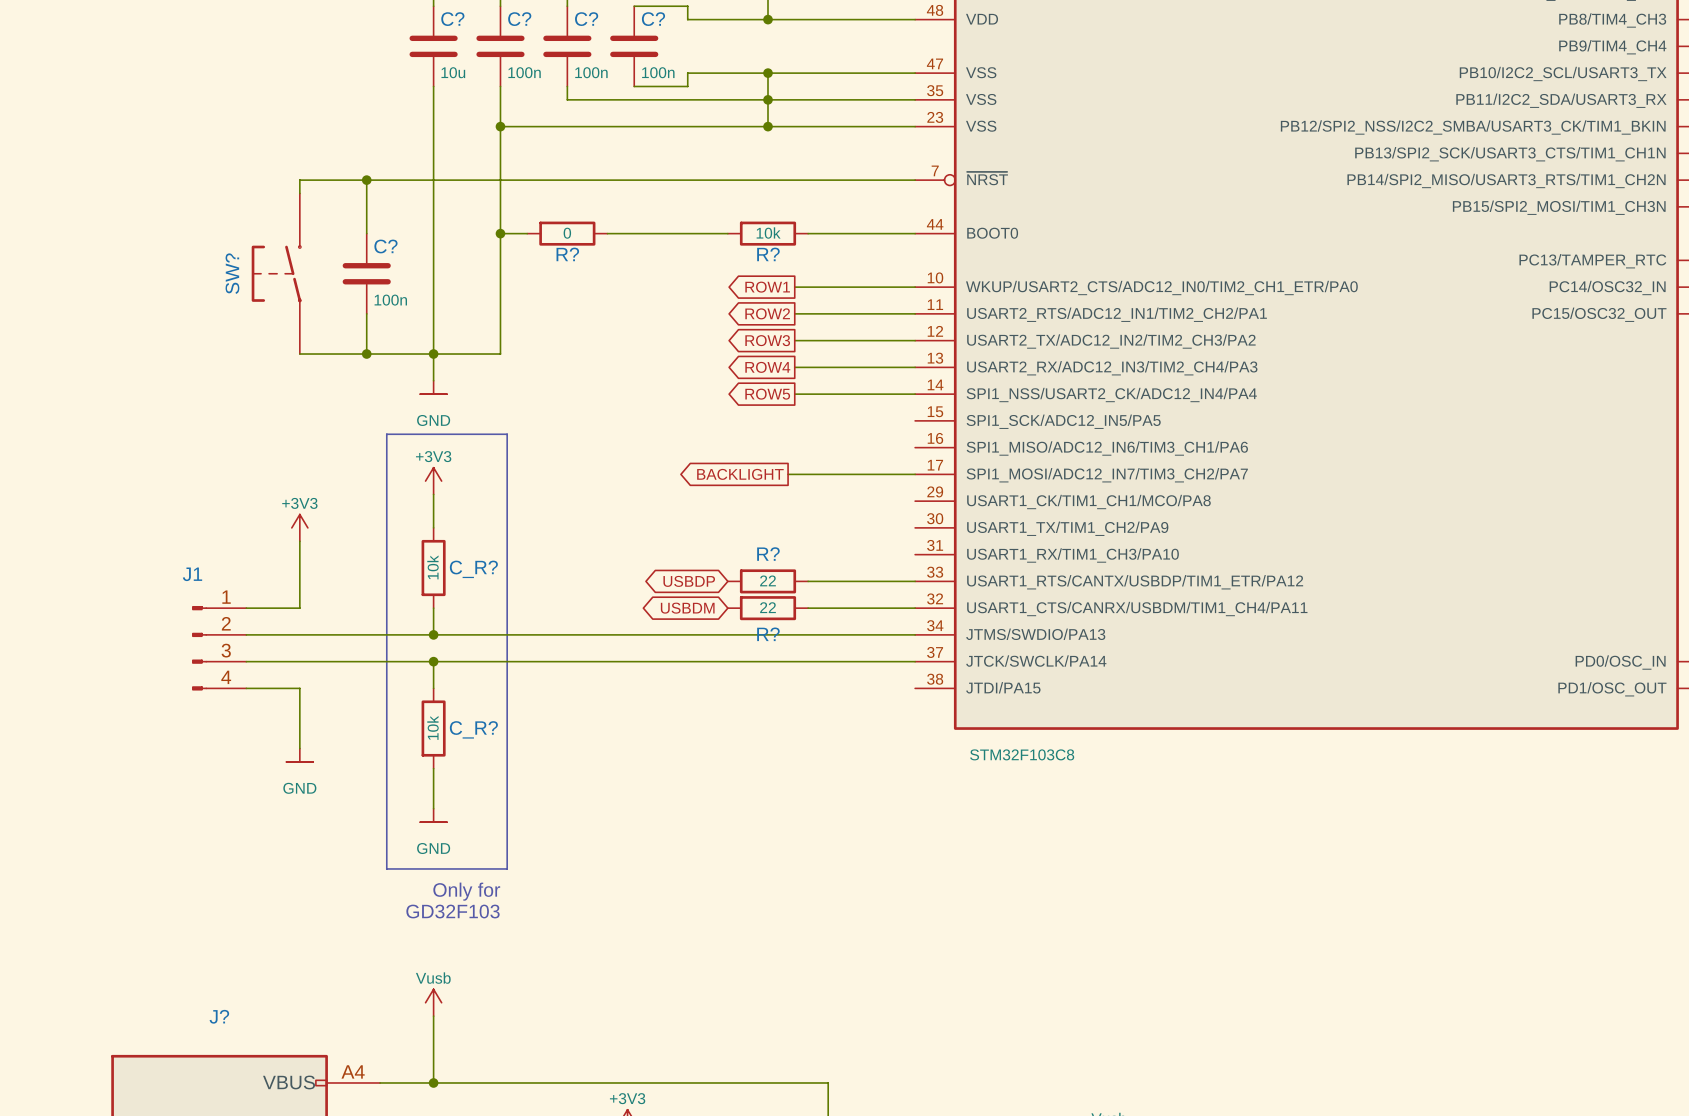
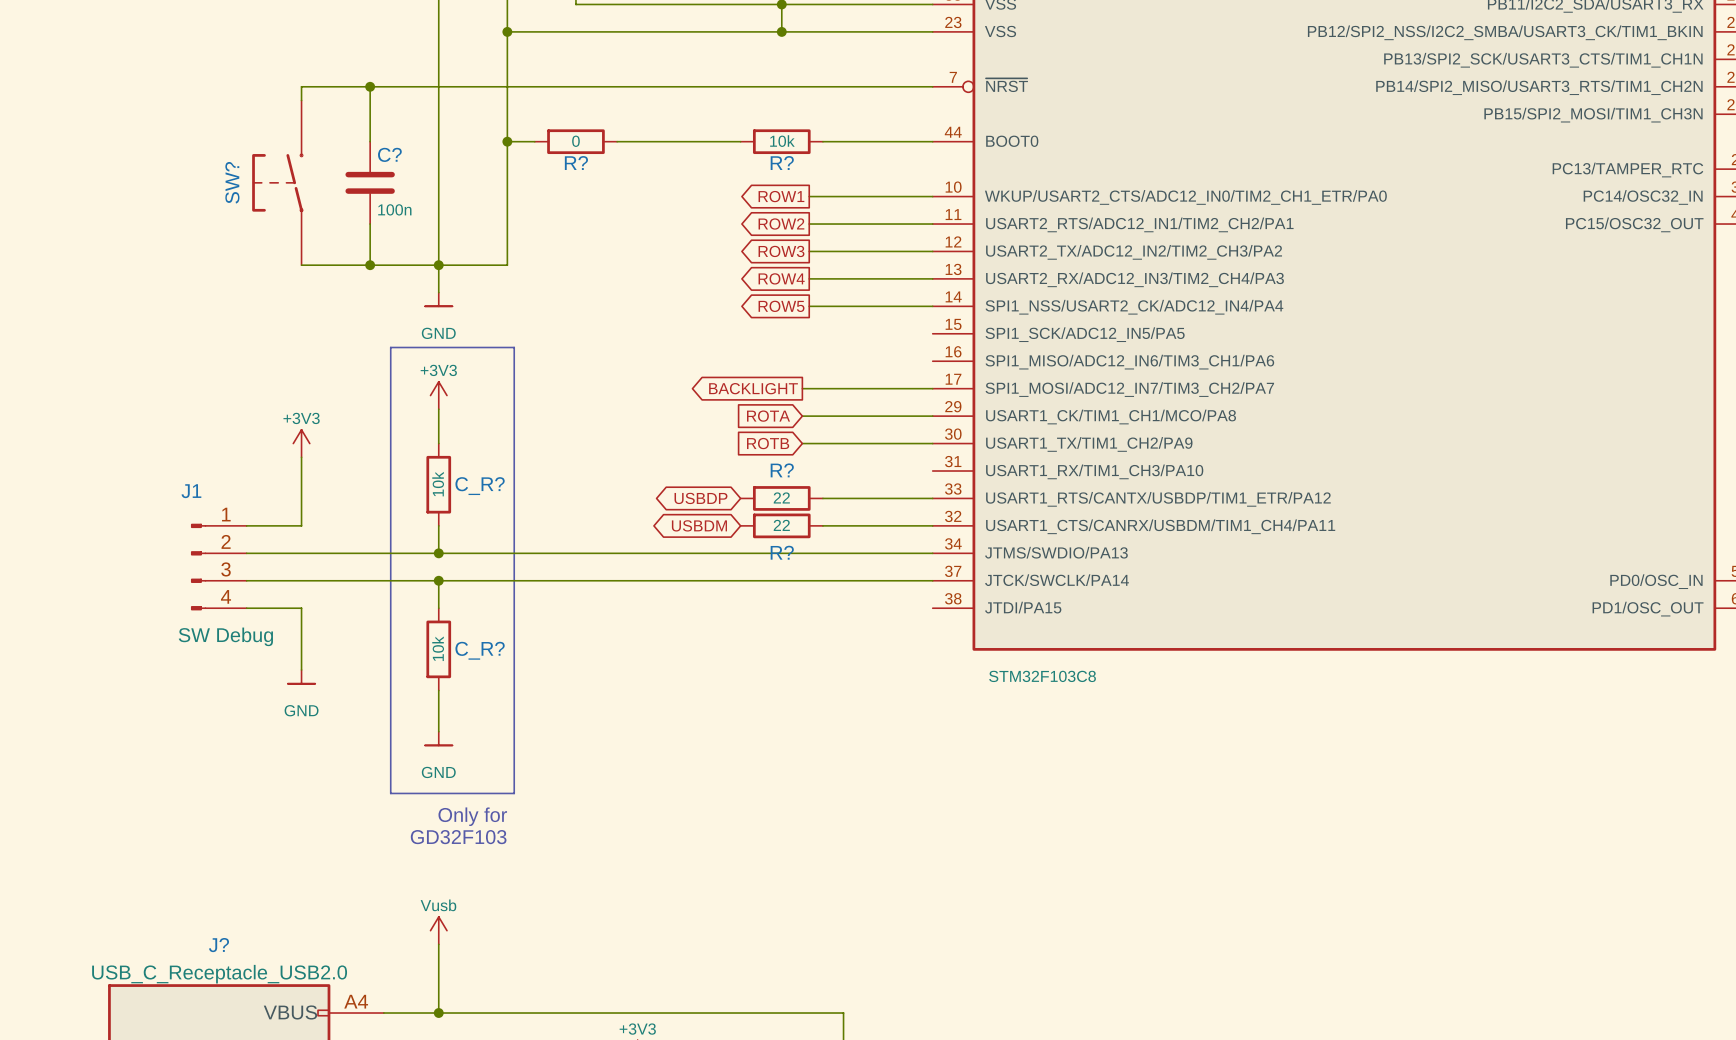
global label: none -> ROTA (768, 416)
wire: none -> (802, 416) (932, 416)
global label: none -> ROTB (768, 443)
wire: none -> (802, 443) (932, 443)
J1 value: none -> SW Debug (225, 636)
J? value: none -> USB_C_Receptacle_USB2.0 (219, 974)

